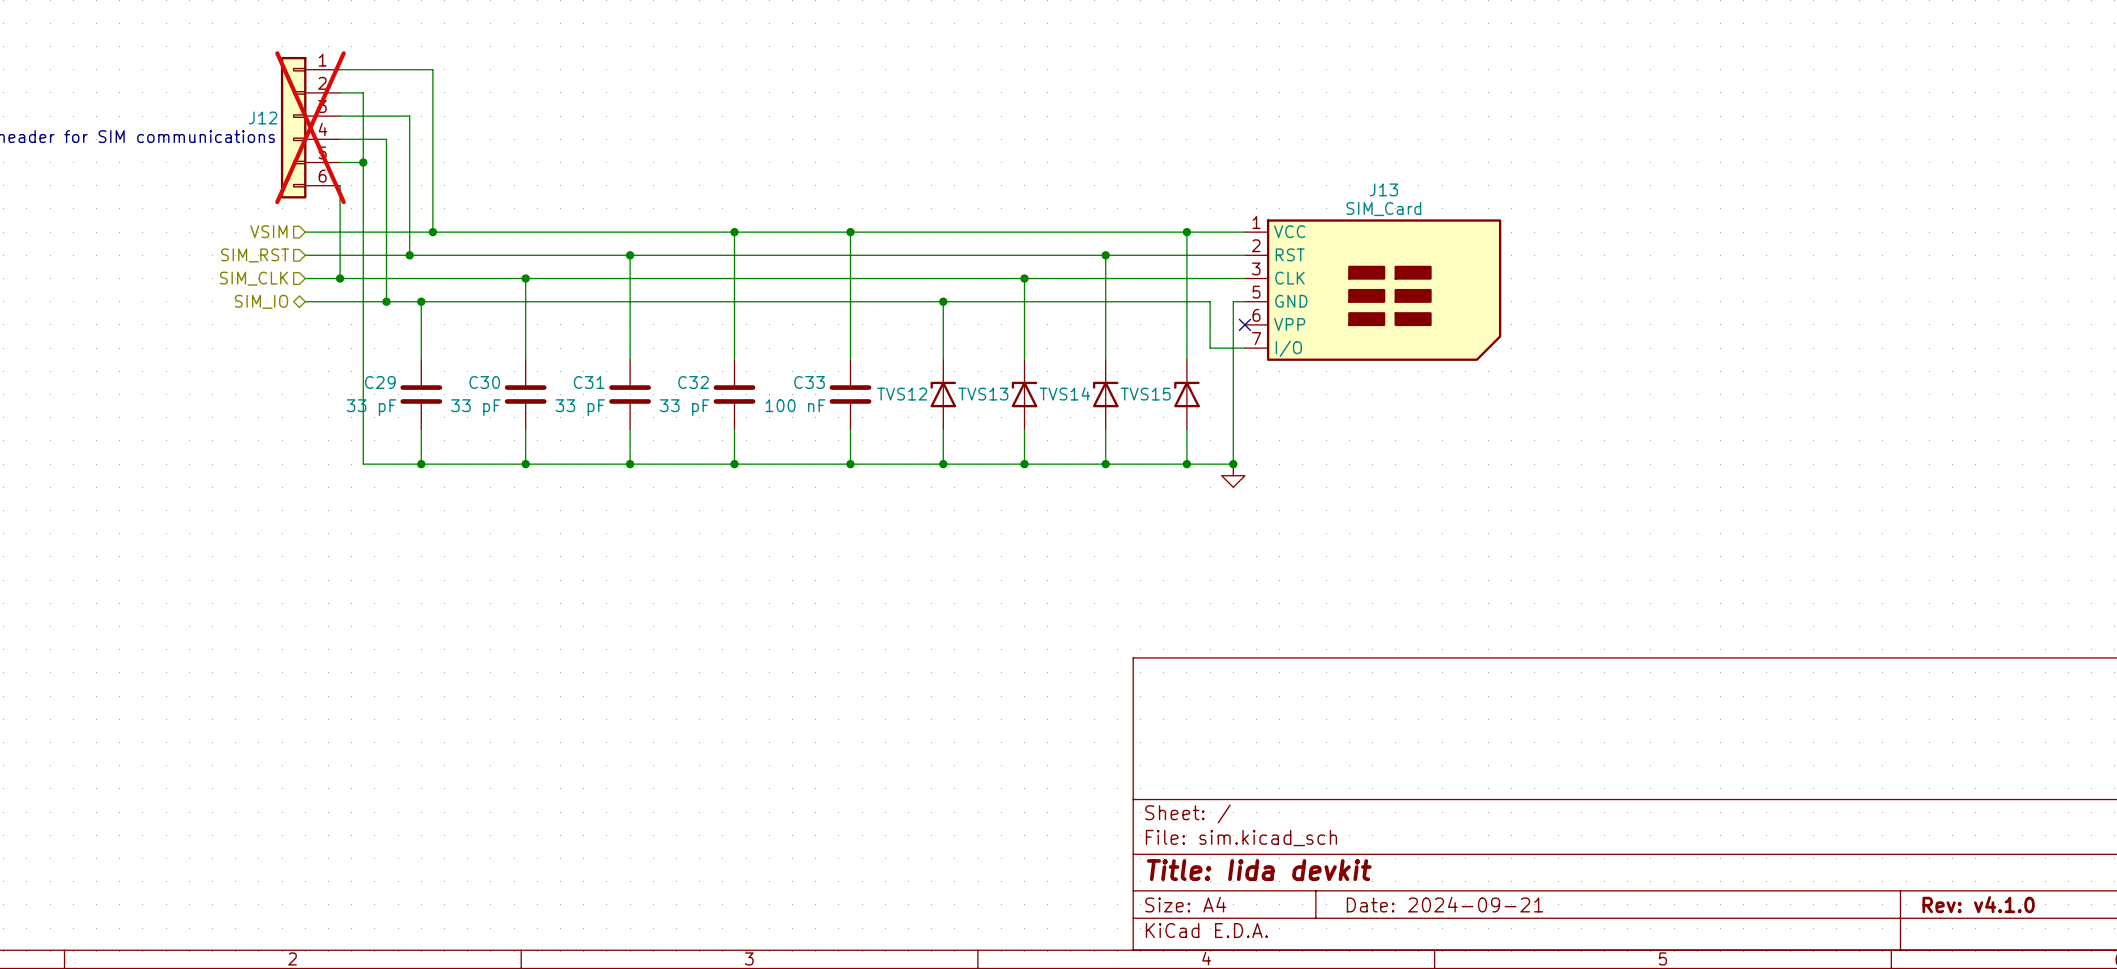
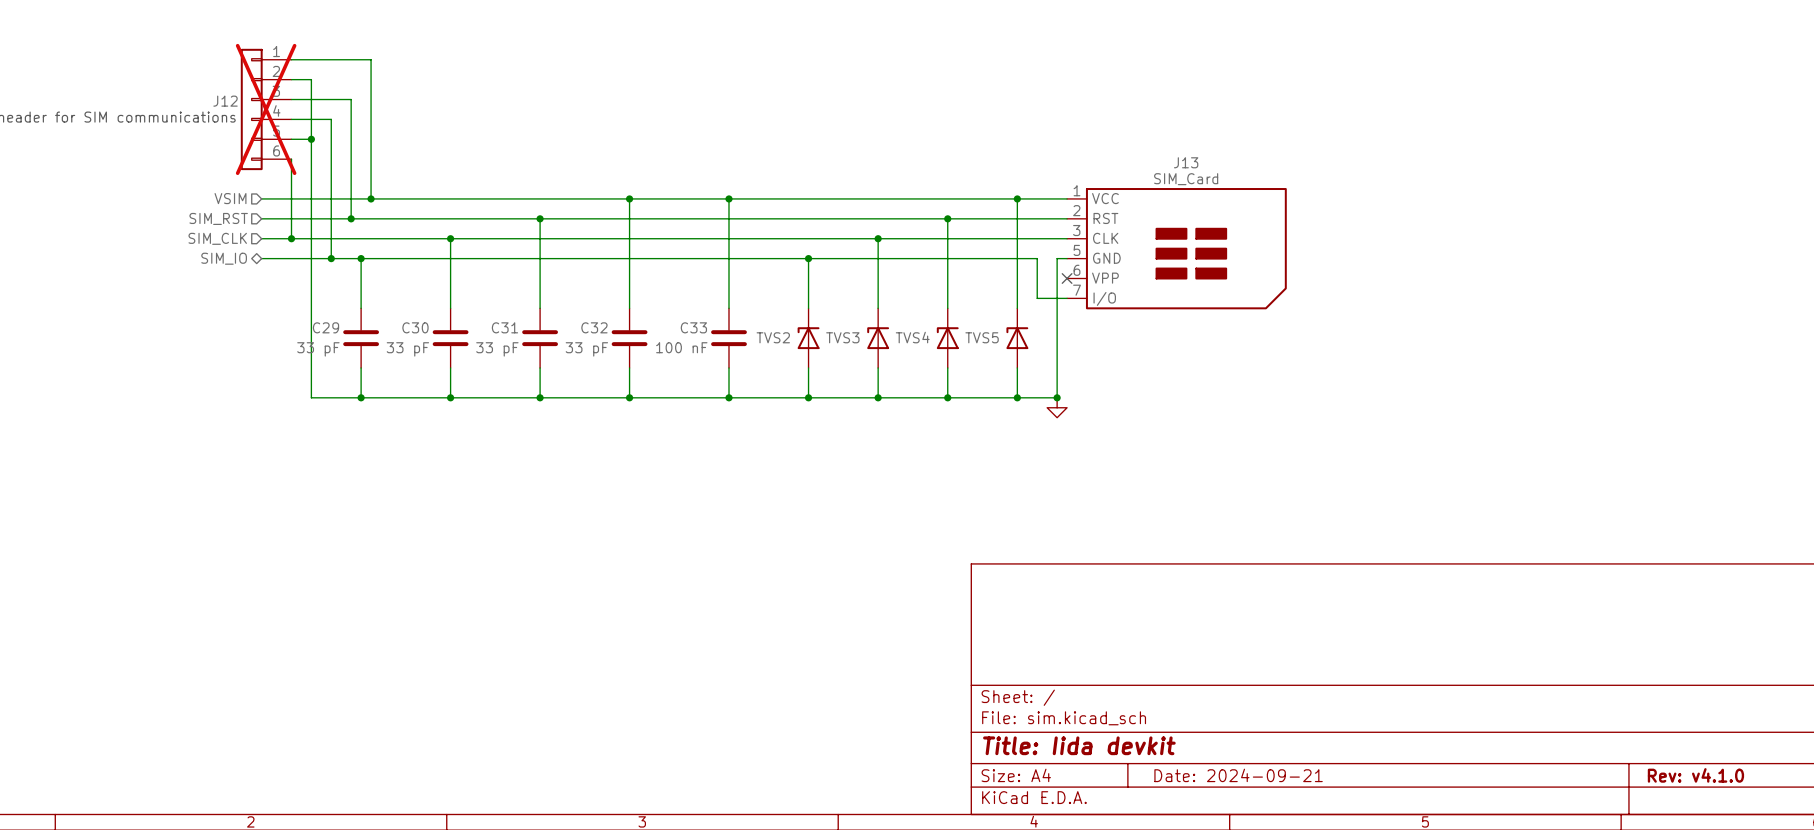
TVS14 name: TVS14 (1064, 393) -> TVS4 (912, 337)
TVS12 name: TVS12 (902, 394) -> TVS2 (773, 337)
TVS13 name: TVS13 (983, 394) -> TVS3 (842, 337)
TVS15 name: TVS15 (1145, 394) -> TVS5 (982, 337)

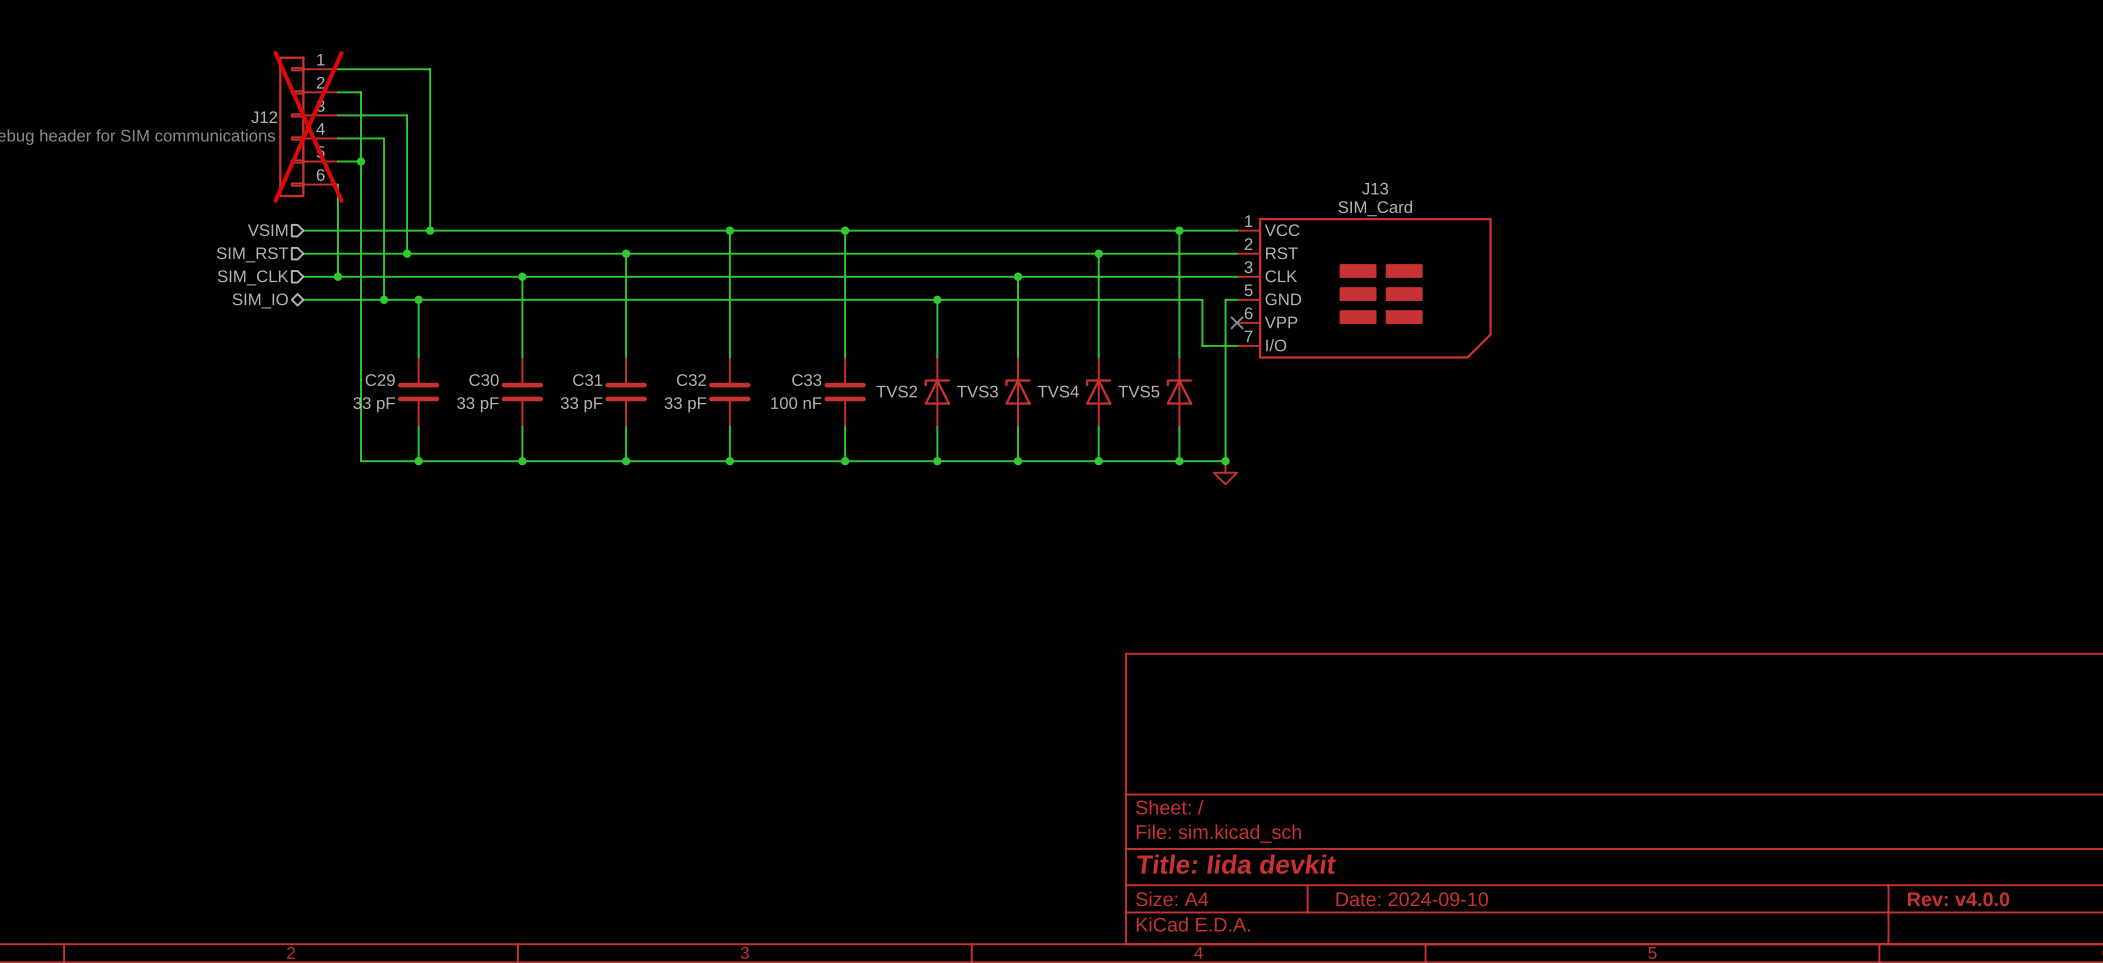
title block: Date: 2024-09-21 (1238, 775) -> Date: 2024-09-10 (1412, 899)
title block: Rev: v4.1.0 (1695, 775) -> Rev: v4.0.0 (1958, 899)

